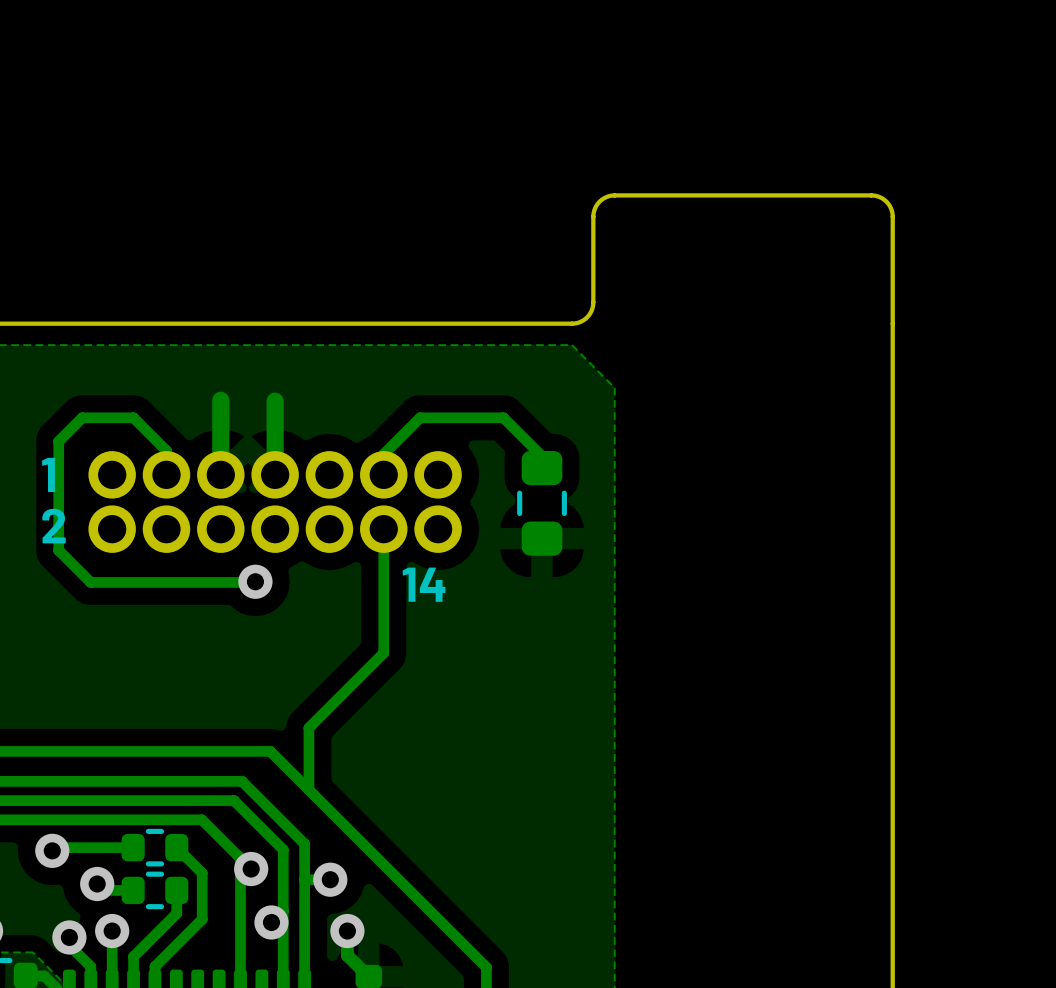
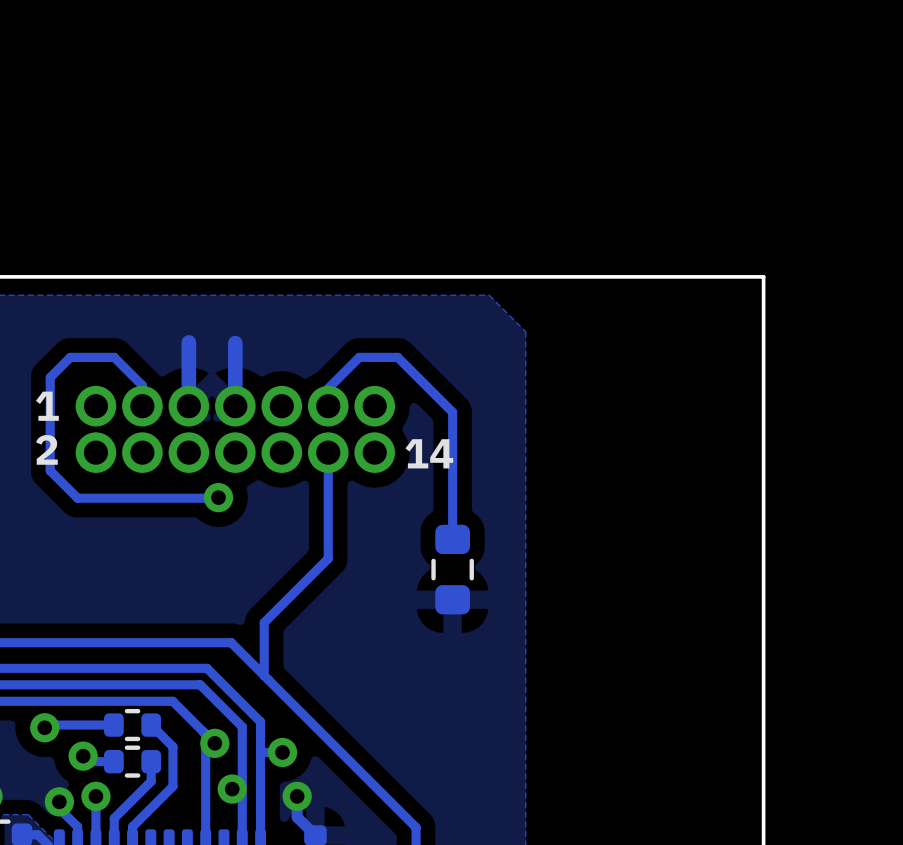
board edge: (892, 323) (892, 213) (889, 206) (884, 199) (871, 195) (614, 195) (606, 197) (597, 203) (593, 213) (592, 307) (584, 319) (571, 323) -> (763, 276) (489, 276)
track: (465, 417) (503, 417) (542, 456) (542, 468) -> (397, 357) (452, 412) (452, 539)
part position: (542, 503) -> (452, 569)
part text position: 14 (424, 584) -> 14 (429, 453)

